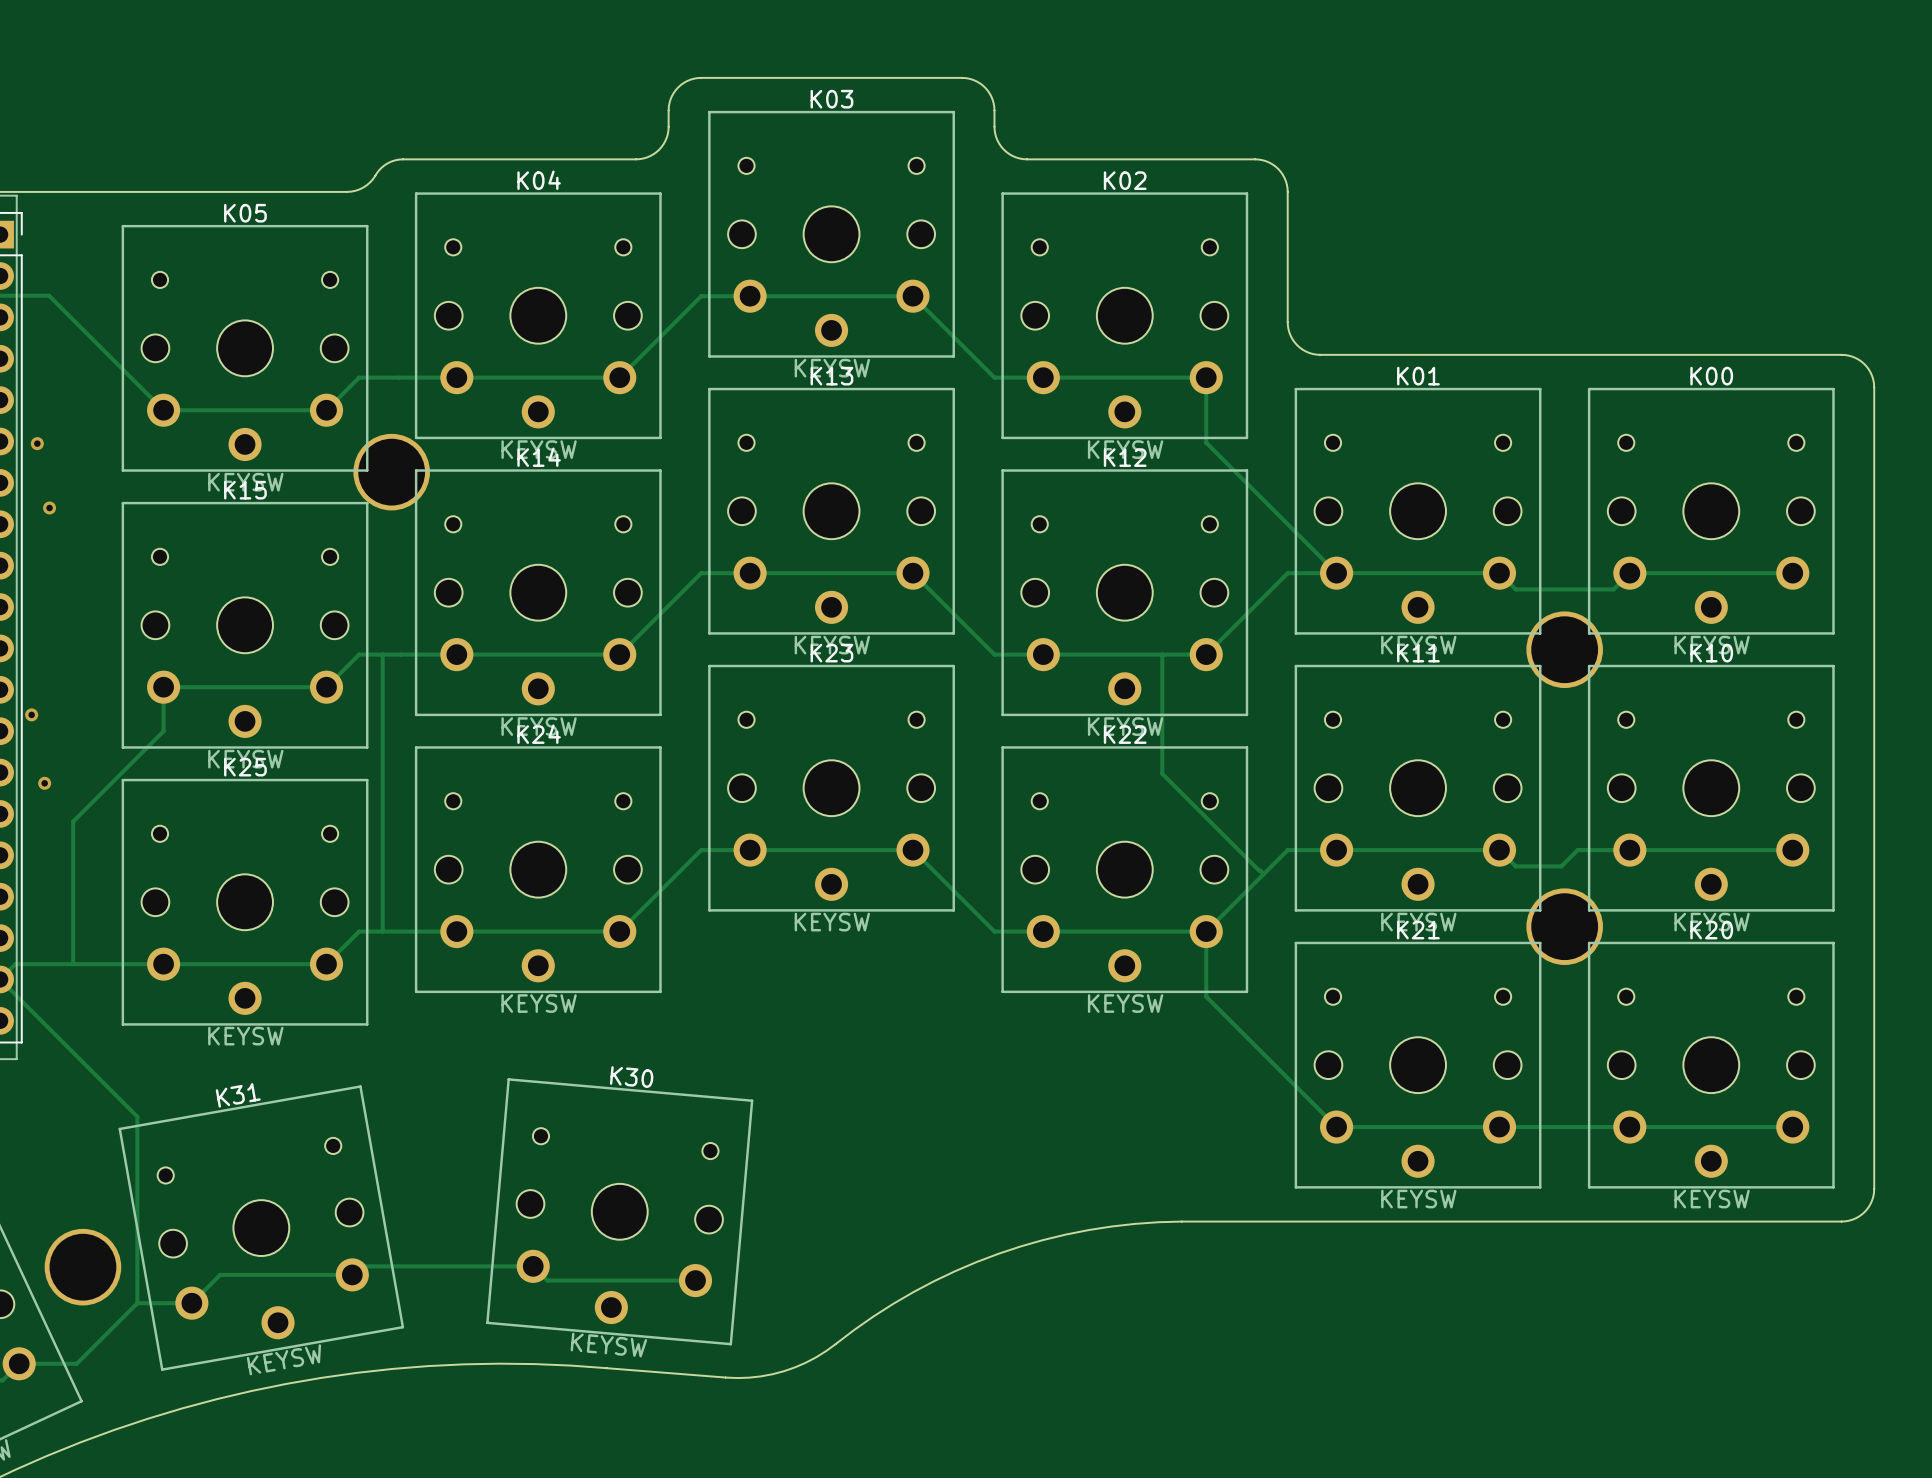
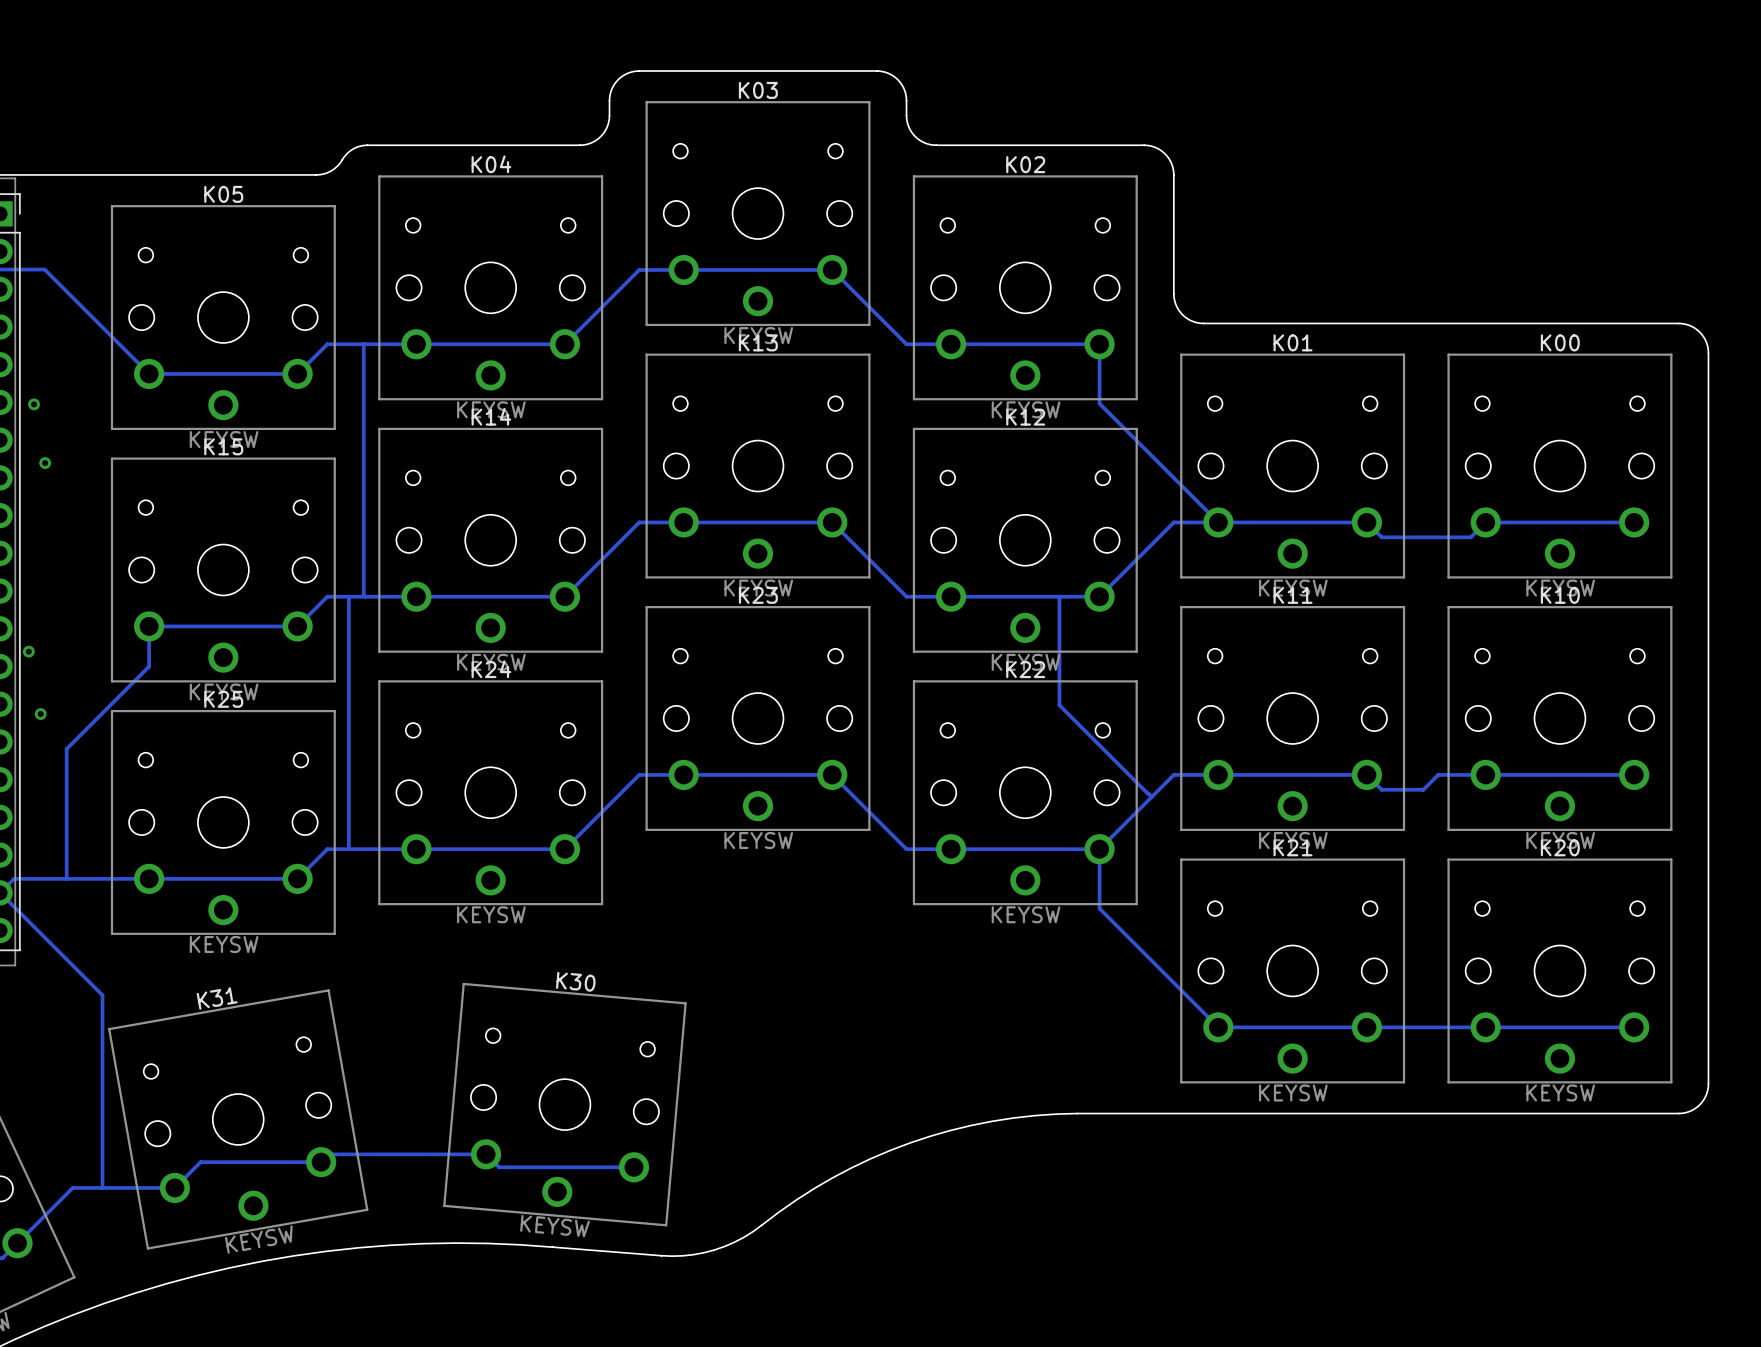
track: none -> (363, 344) (365, 596)
part: (391, 472) -> none
part: (1564, 649) -> none
part: (1564, 926) -> none
track: (112, 1091) (137, 1116) (137, 1303) (76, 1363) (19, 1363) -> (102, 995) (102, 1187)
part: (82, 1267) -> none
track: none -> (125, 1187) (72, 1187) (17, 1243)

